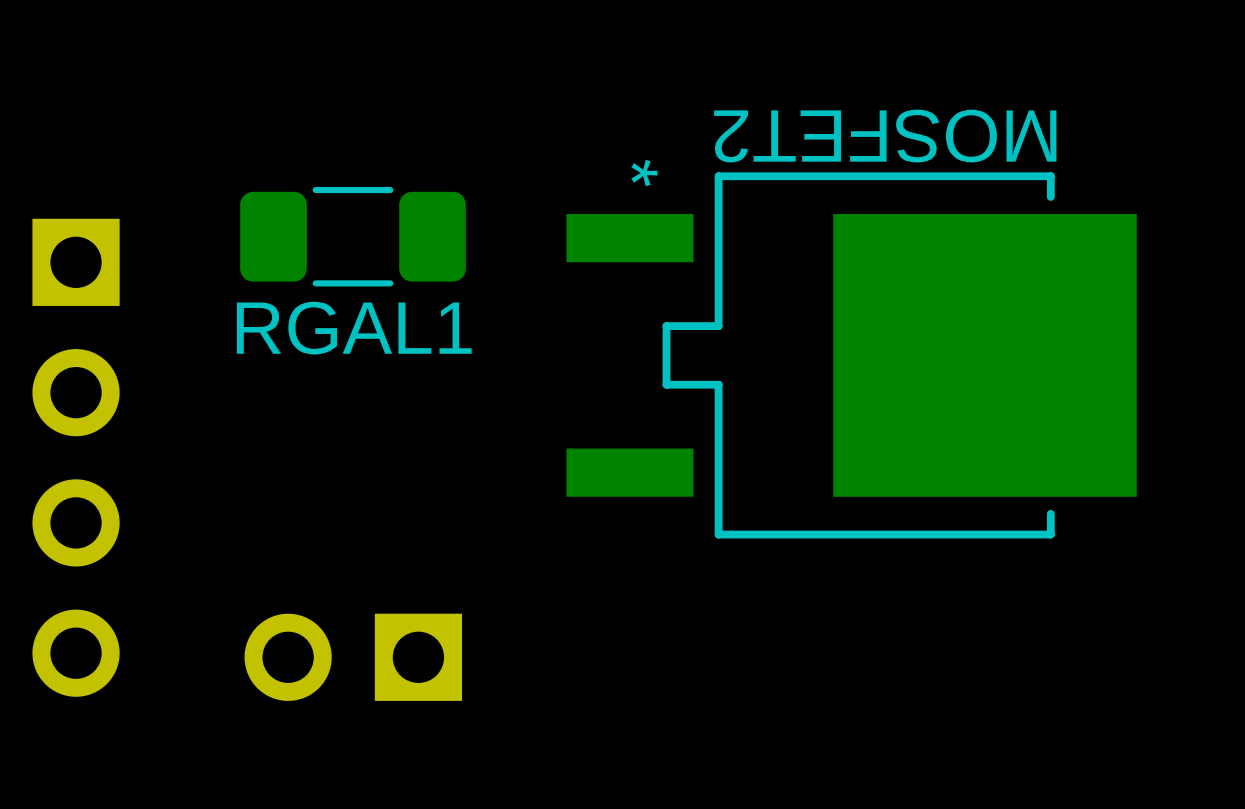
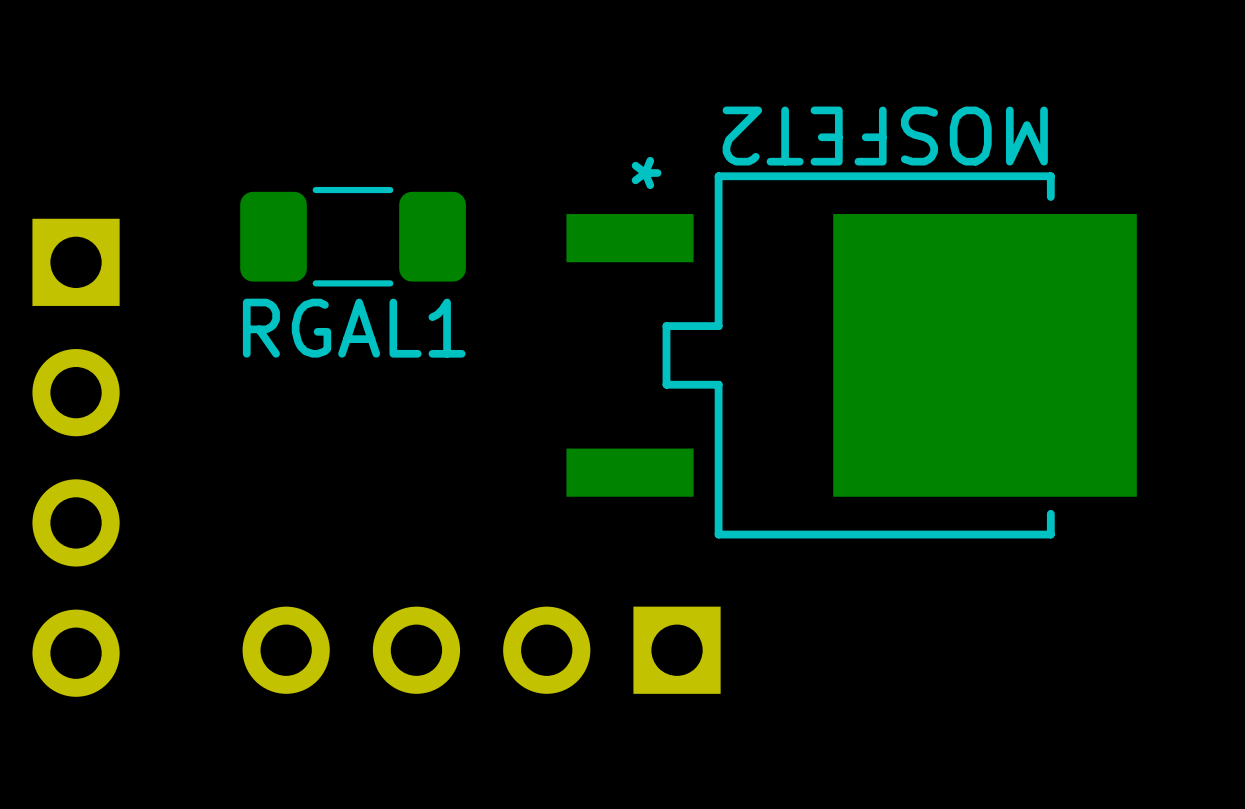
part: none -> (481, 650)
part: (353, 657) -> none

